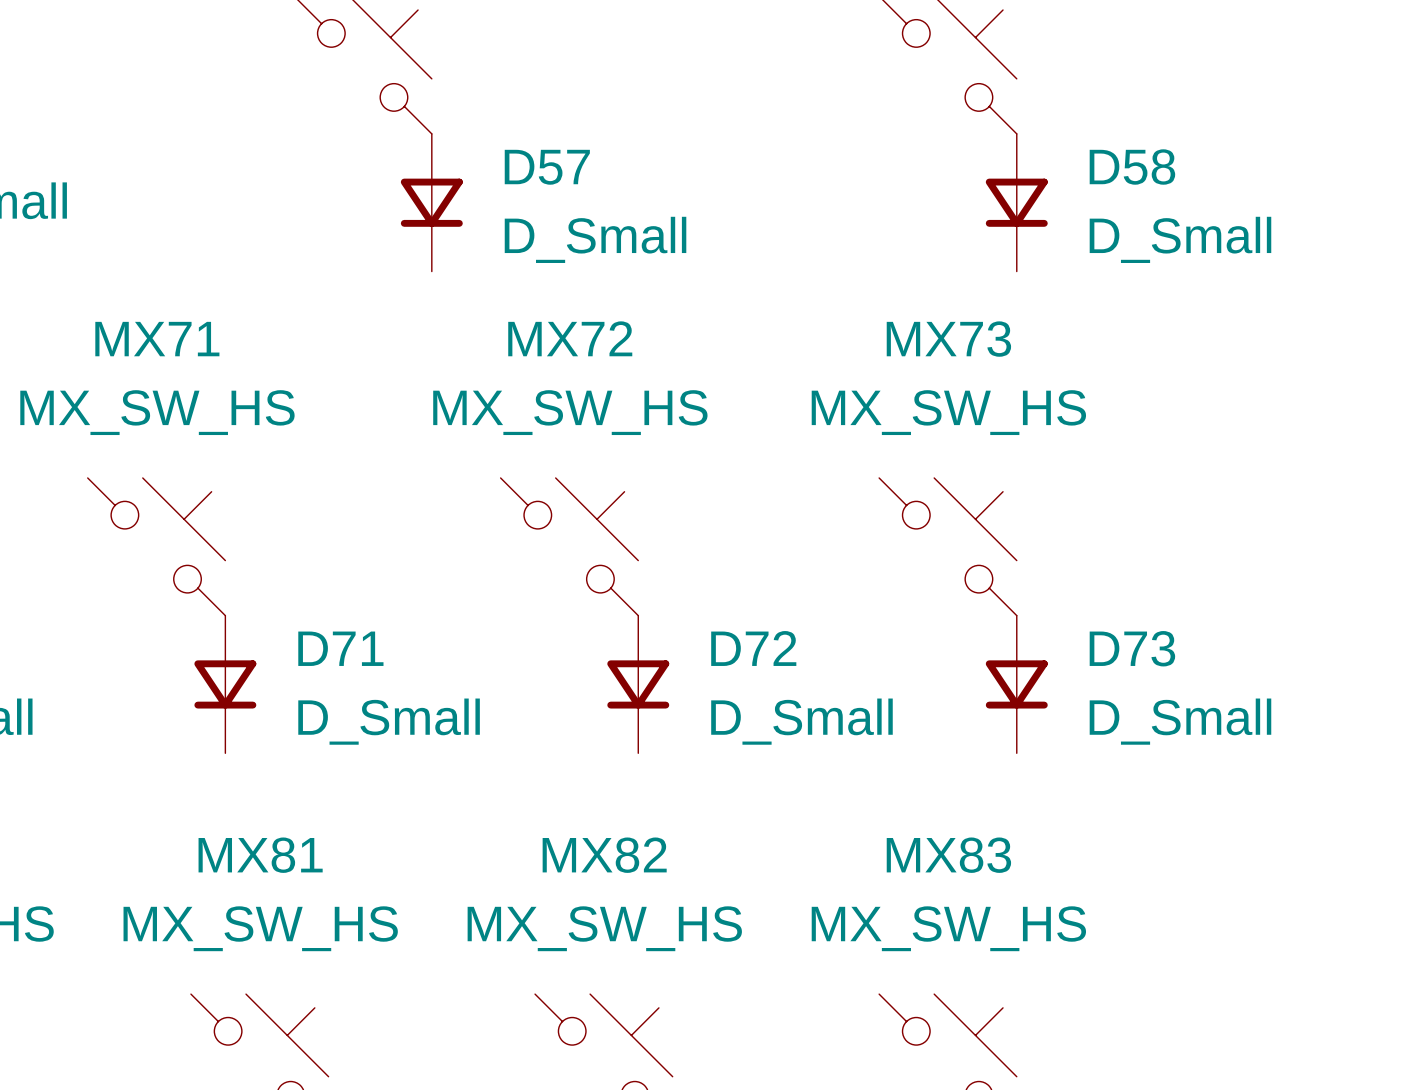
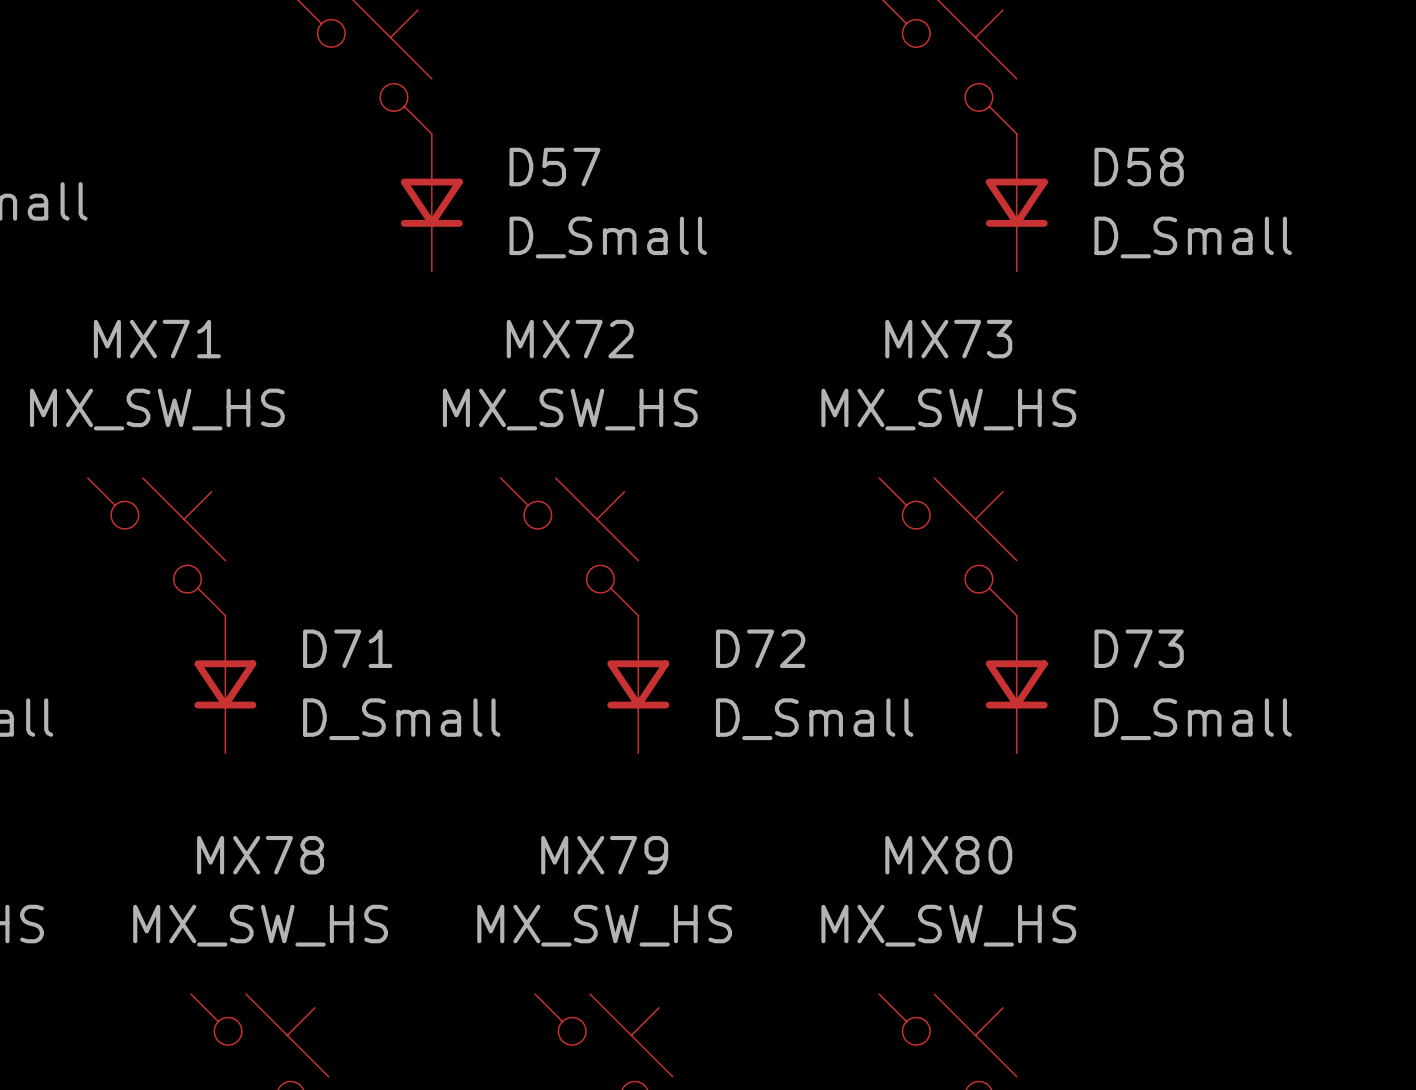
MX81 name: MX81 (260, 855) -> MX78 (260, 855)
MX82 name: MX82 (604, 855) -> MX79 (604, 855)
MX83 name: MX83 (948, 855) -> MX80 (948, 855)

